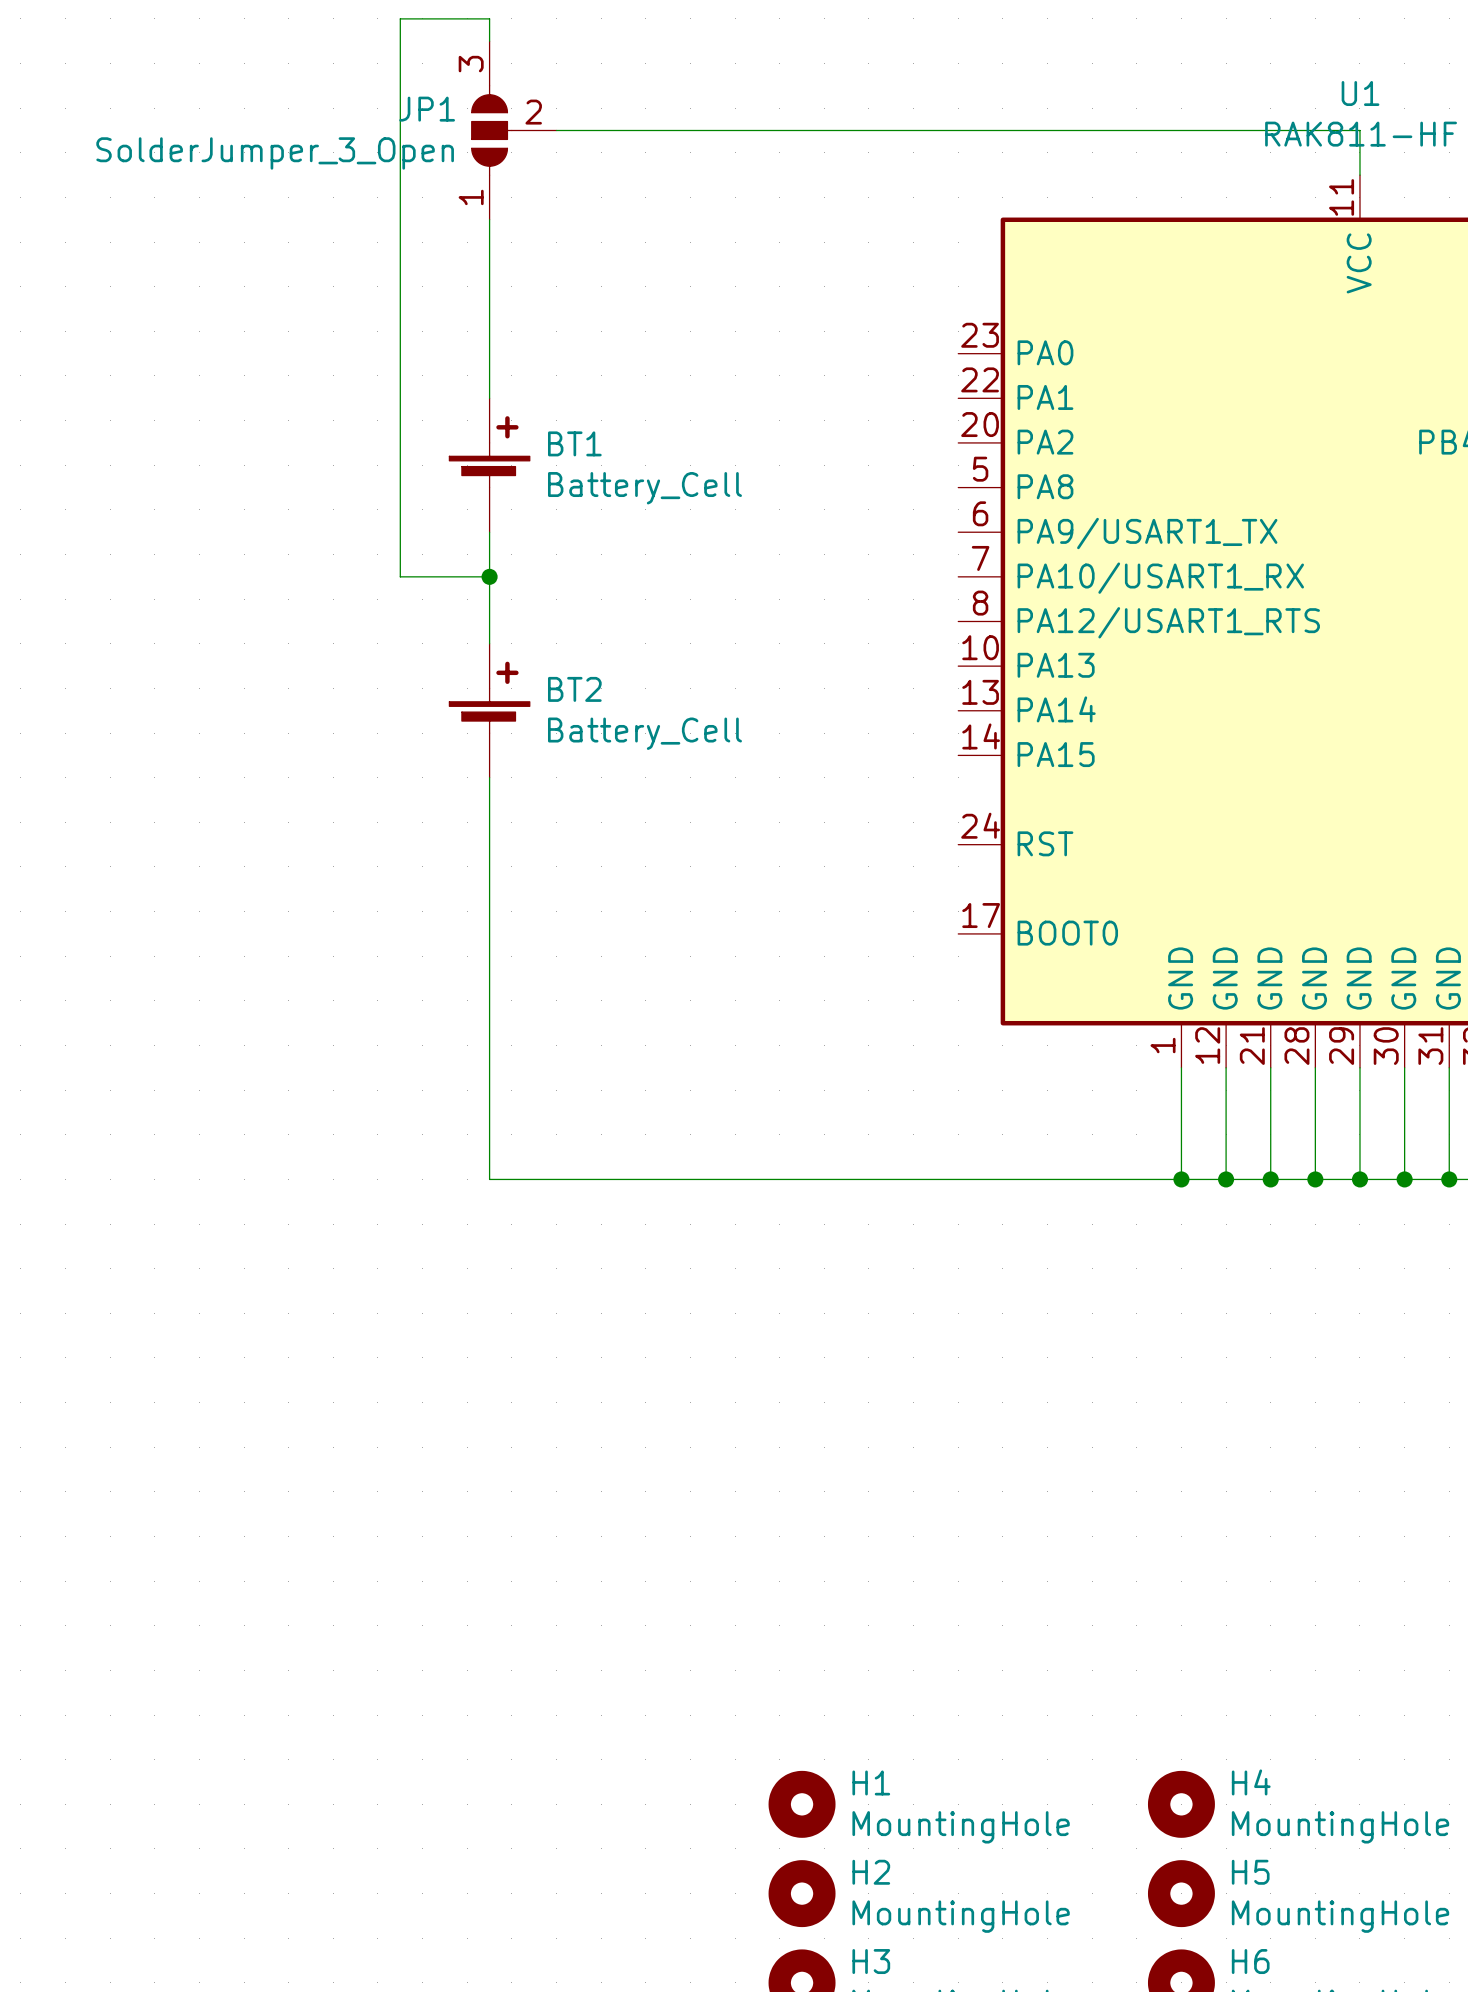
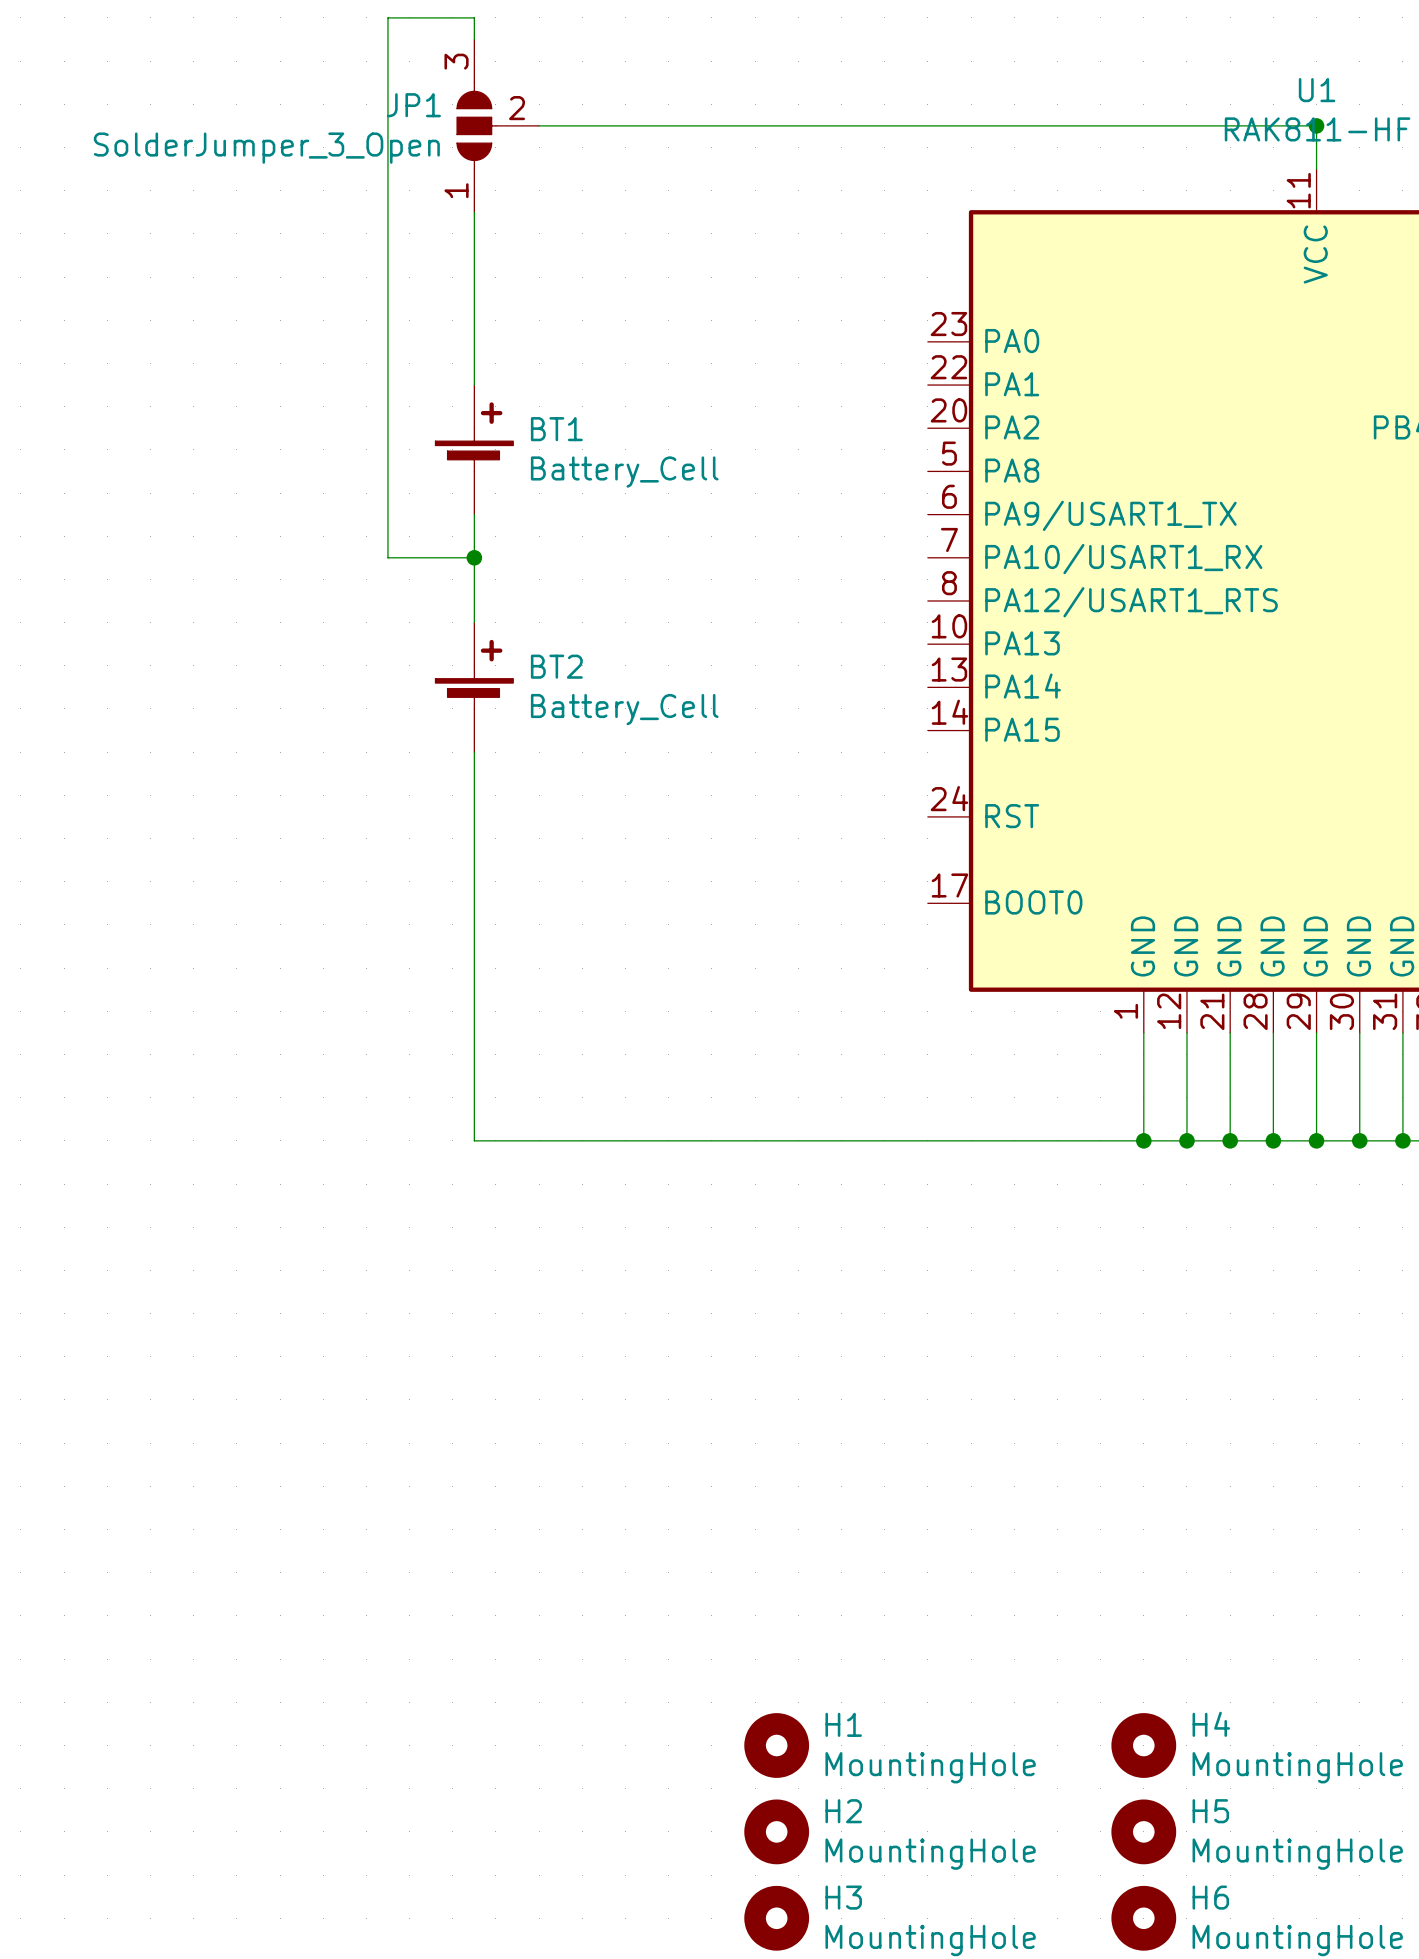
junction: none -> (1316, 125)

